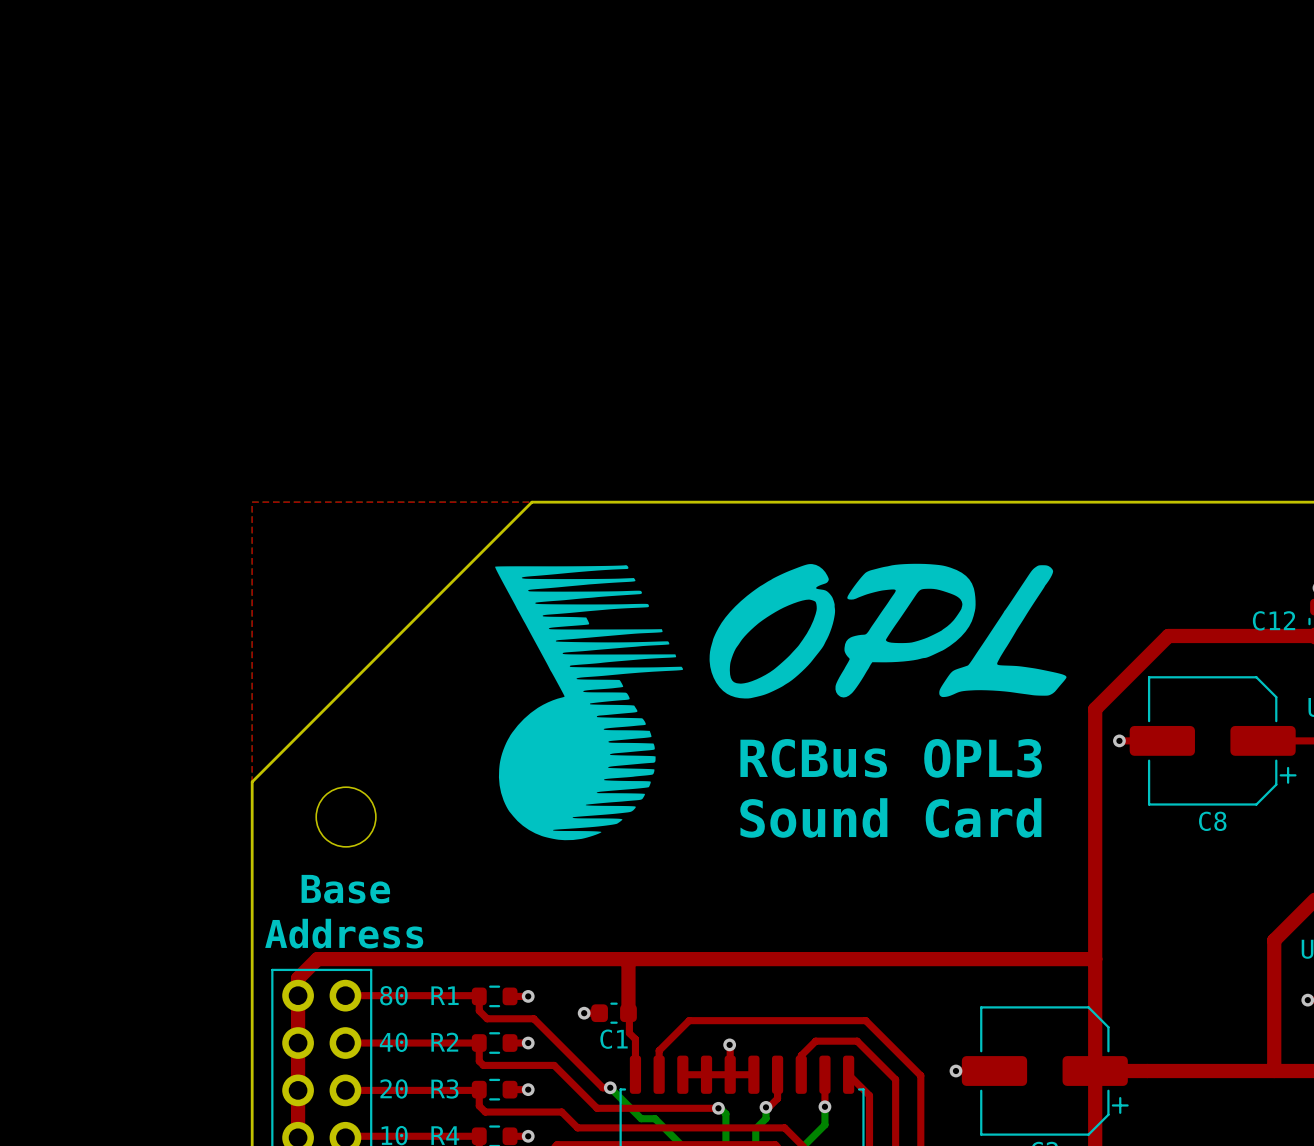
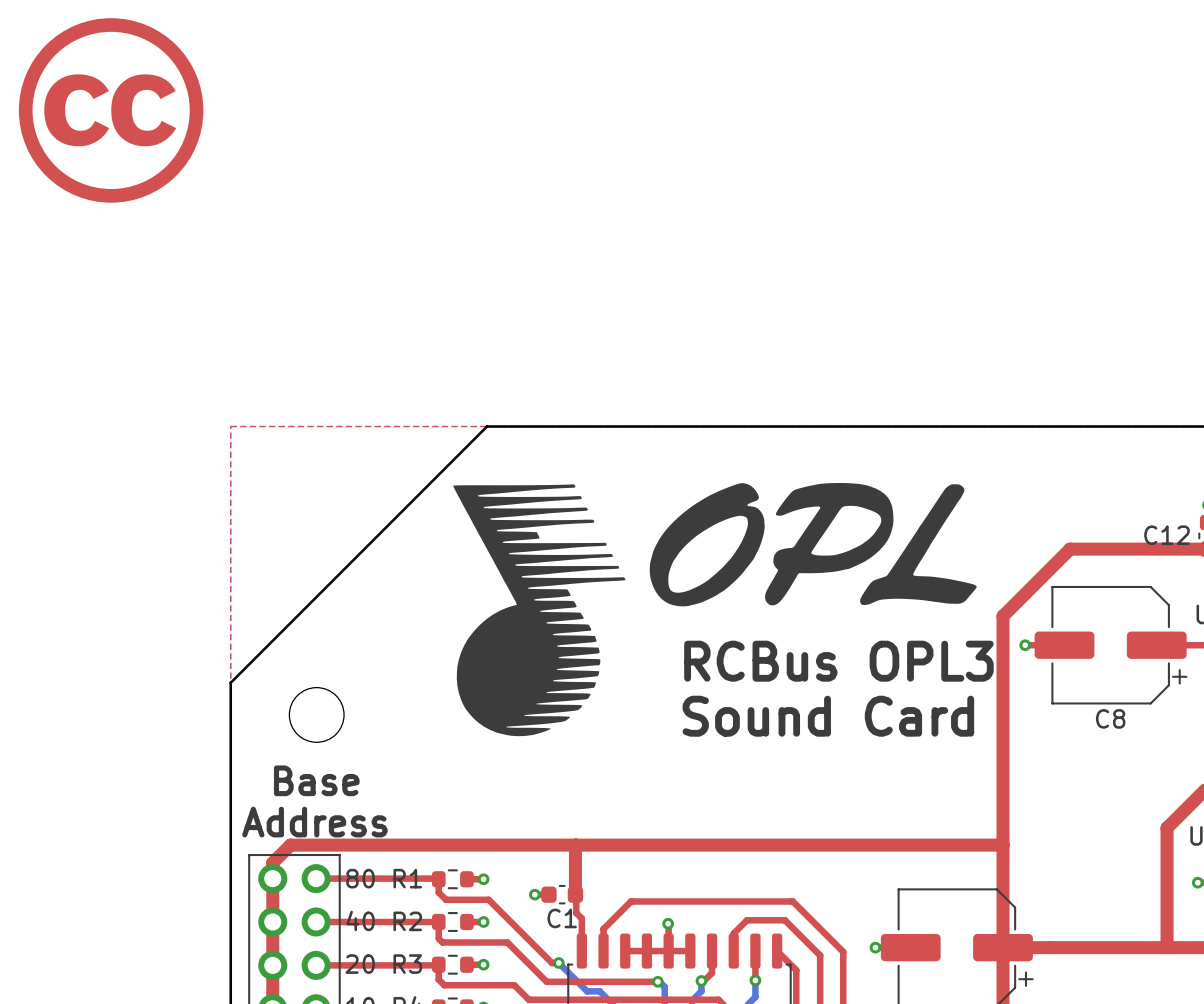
drawing: none -> [18, 18, 204, 203]

